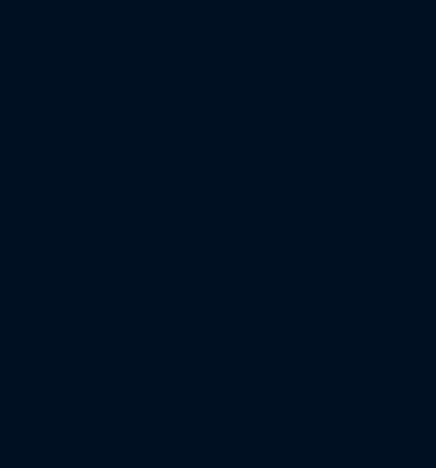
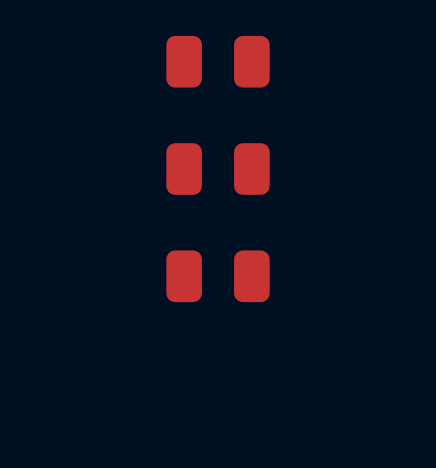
part: none -> (217, 61)
part: none -> (217, 169)
part: none -> (217, 276)

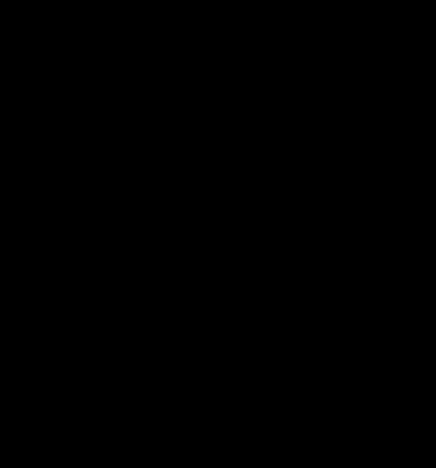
part: (217, 61) -> none
part: (217, 169) -> none
part: (217, 276) -> none

